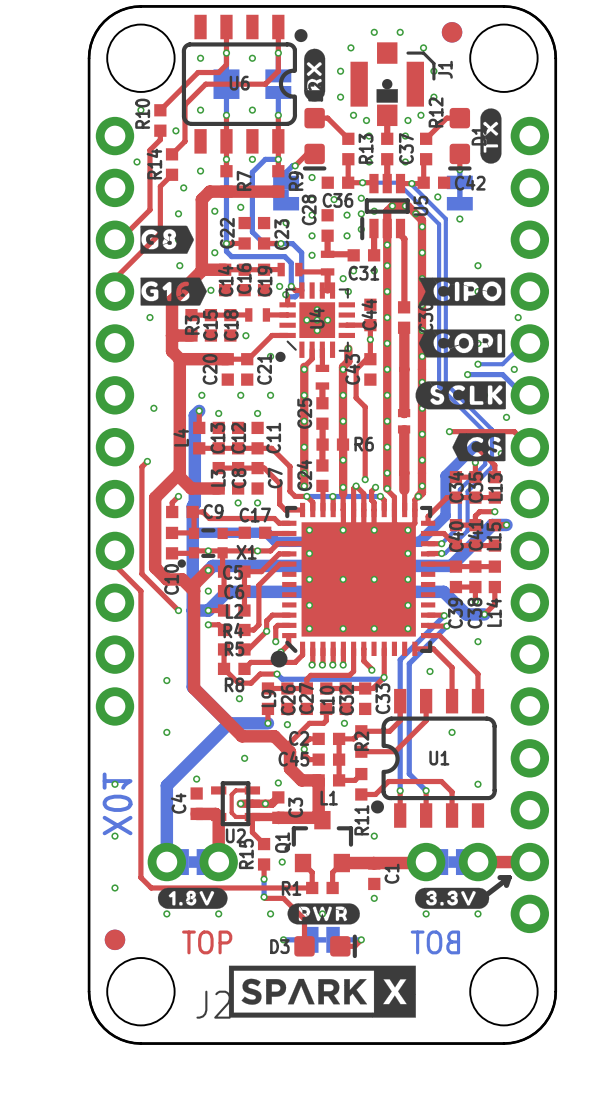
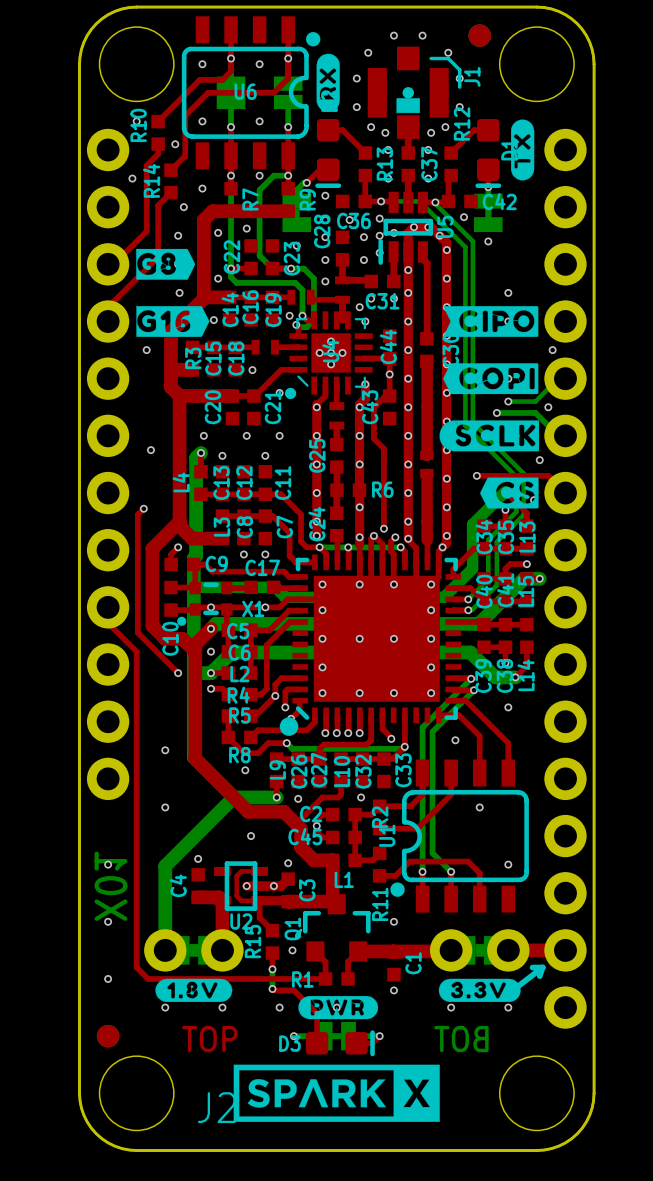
U1 name rotation: 0° (439, 758) -> 90° counterclockwise (387, 835)
U1 name position: U1 (439, 758) -> U1 (387, 835)

